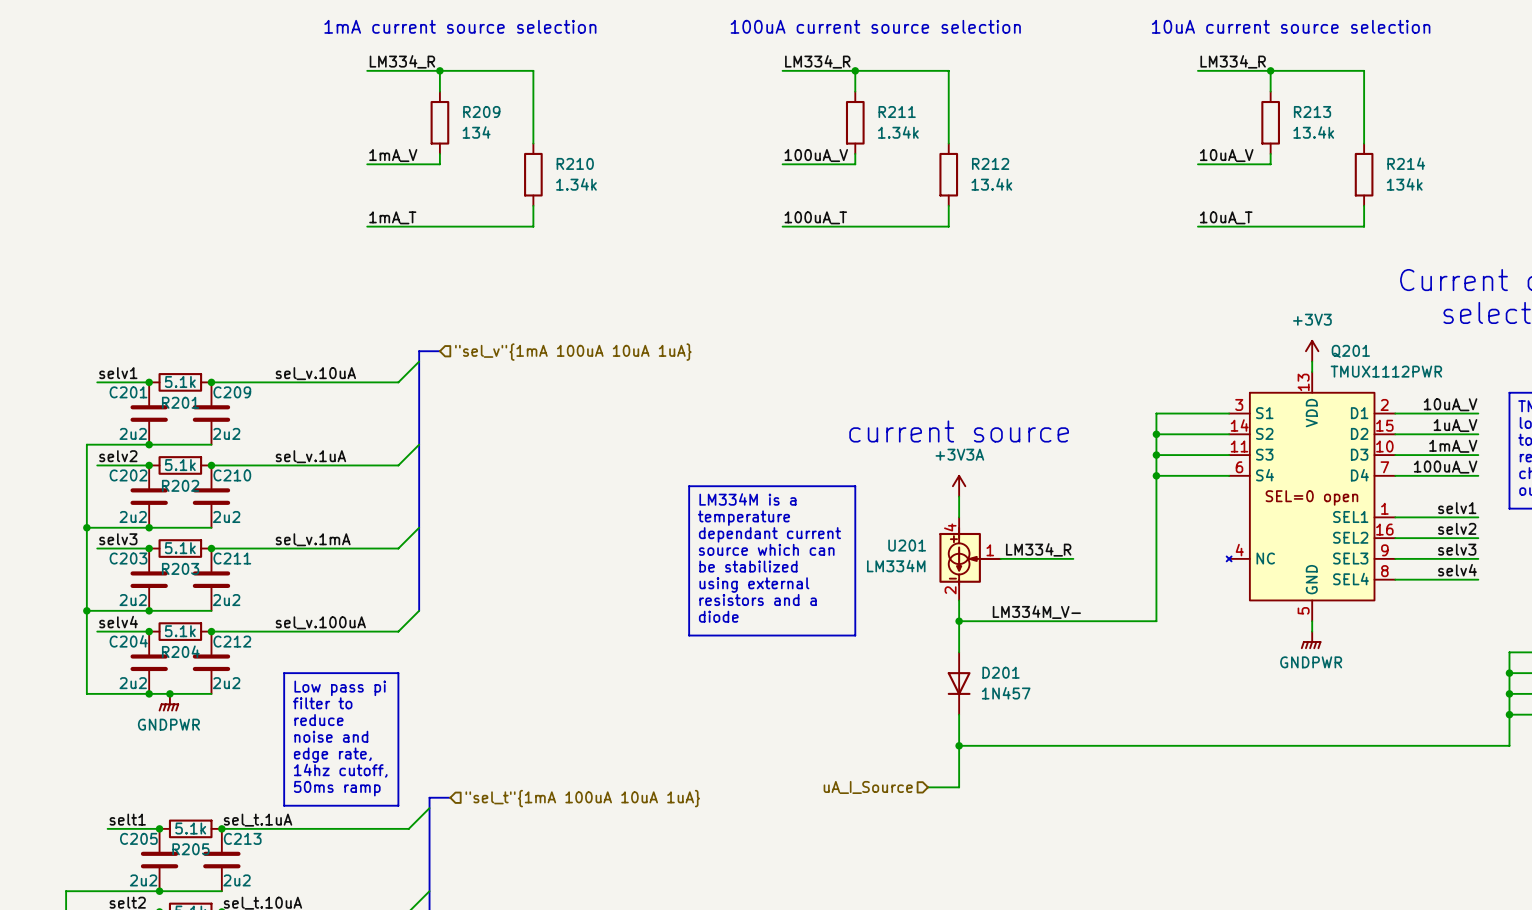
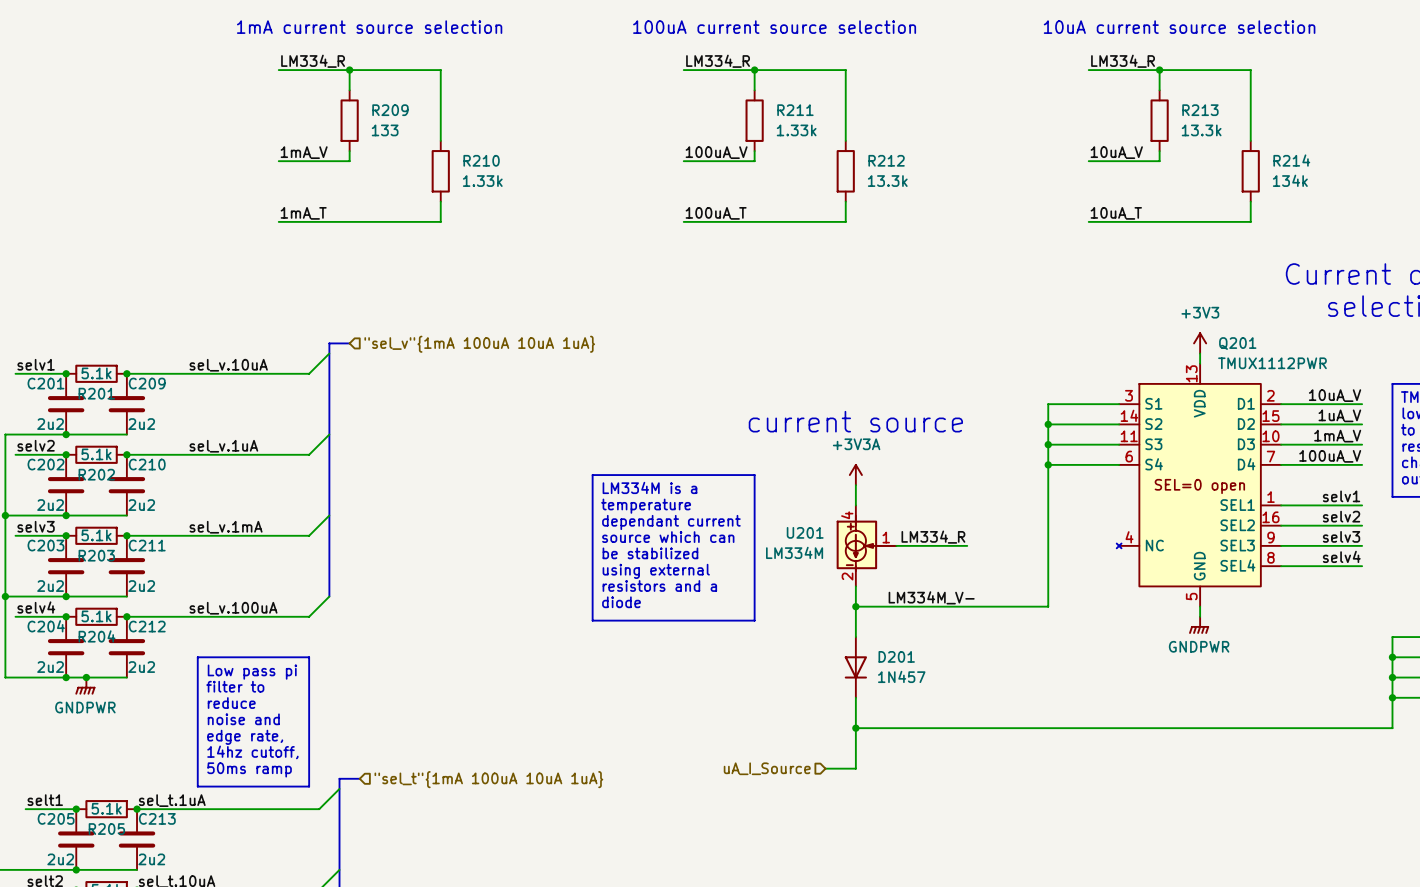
R209 value: 134 (476, 132) -> 133 (385, 130)
R211 value: 1.34k (898, 132) -> 1.33k (796, 130)
R213 value: 13.4k (1313, 132) -> 13.3k (1201, 130)
R210 value: 1.34k (576, 184) -> 1.33k (482, 181)
R212 value: 13.4k (991, 184) -> 13.3k (887, 181)

